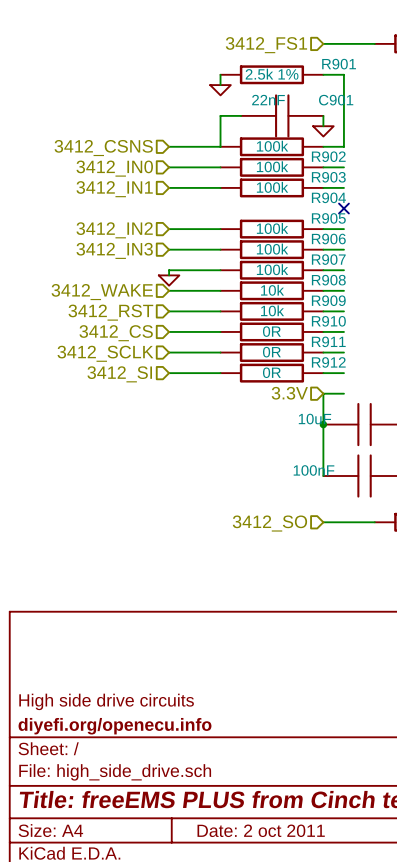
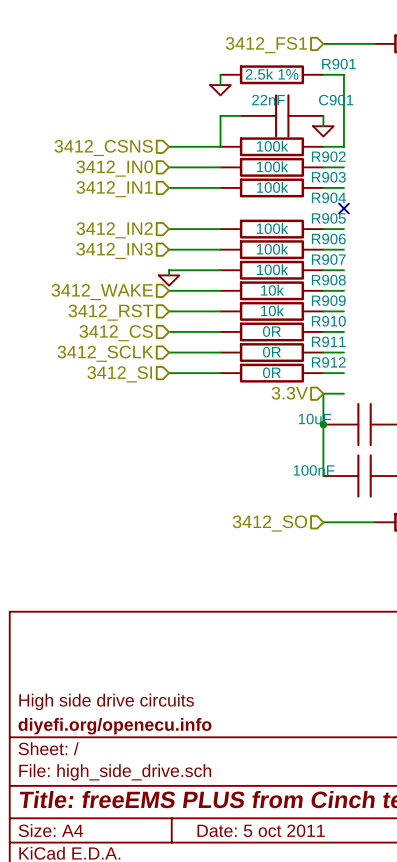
title block: Date: 2 oct 2011 (261, 830) -> Date: 5 oct 2011 (261, 830)

